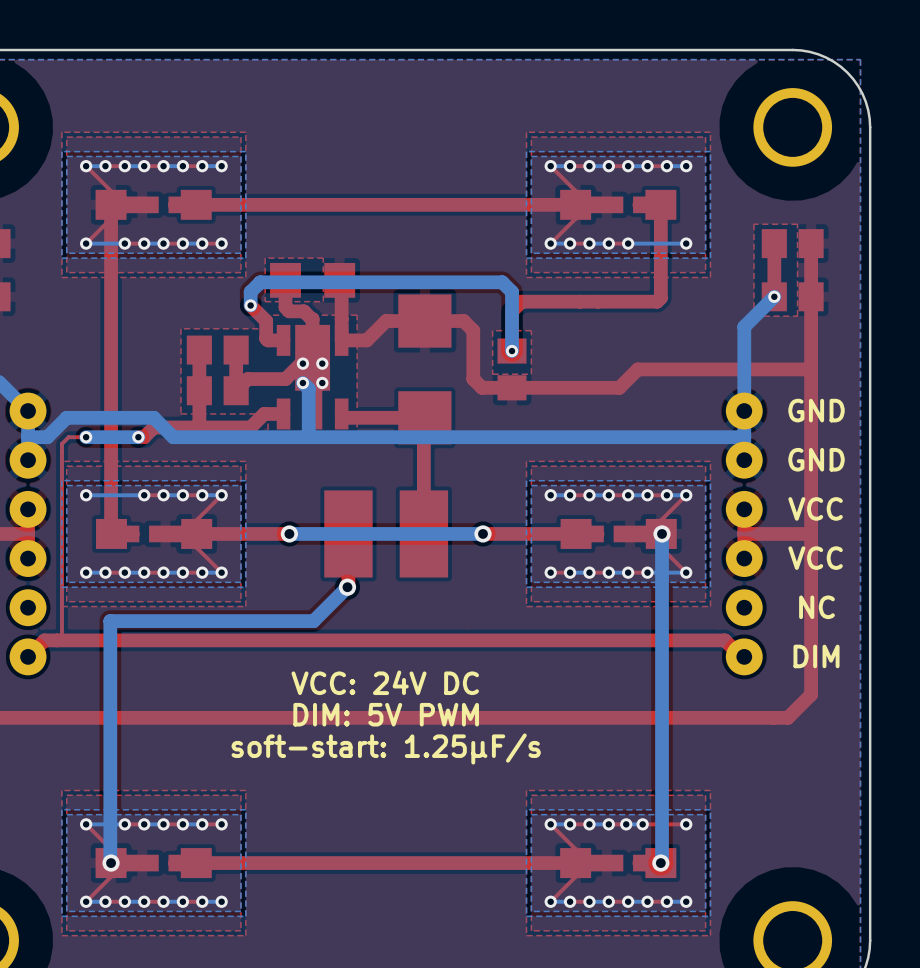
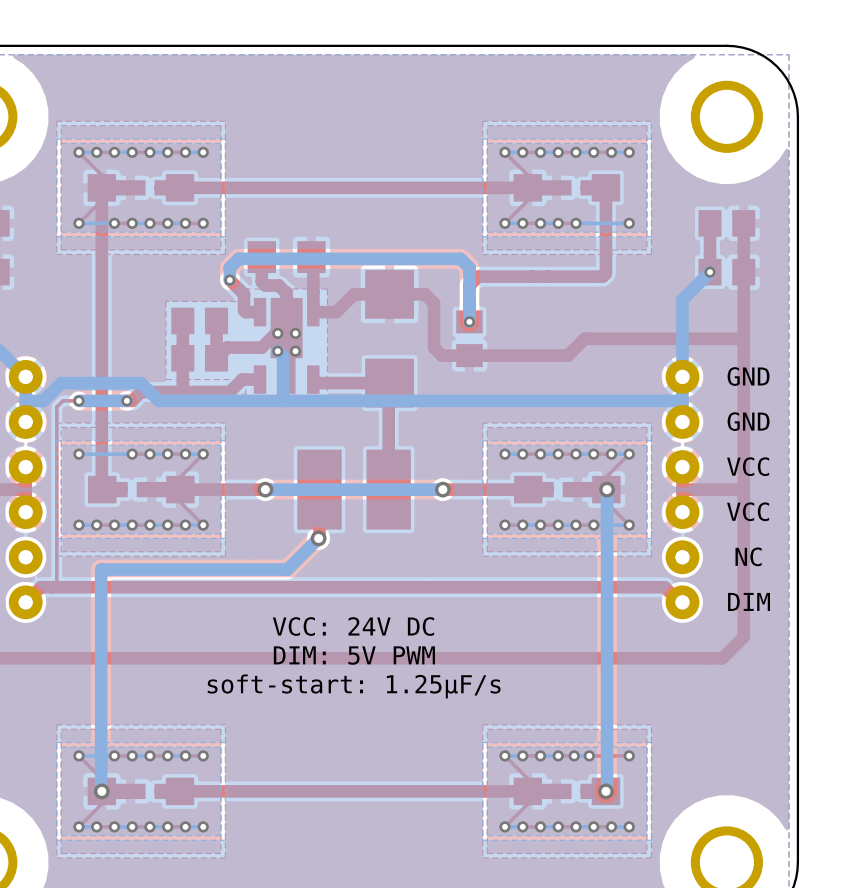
top zone outline: (797, 224) (753, 224) (753, 316) (797, 316) (797, 224) -> none
top zone outline: (323, 258) (323, 301) (265, 301) (265, 258) (323, 258) -> none
top zone outline: (531, 330) (531, 374) (492, 374) (492, 330) (531, 330) -> none

